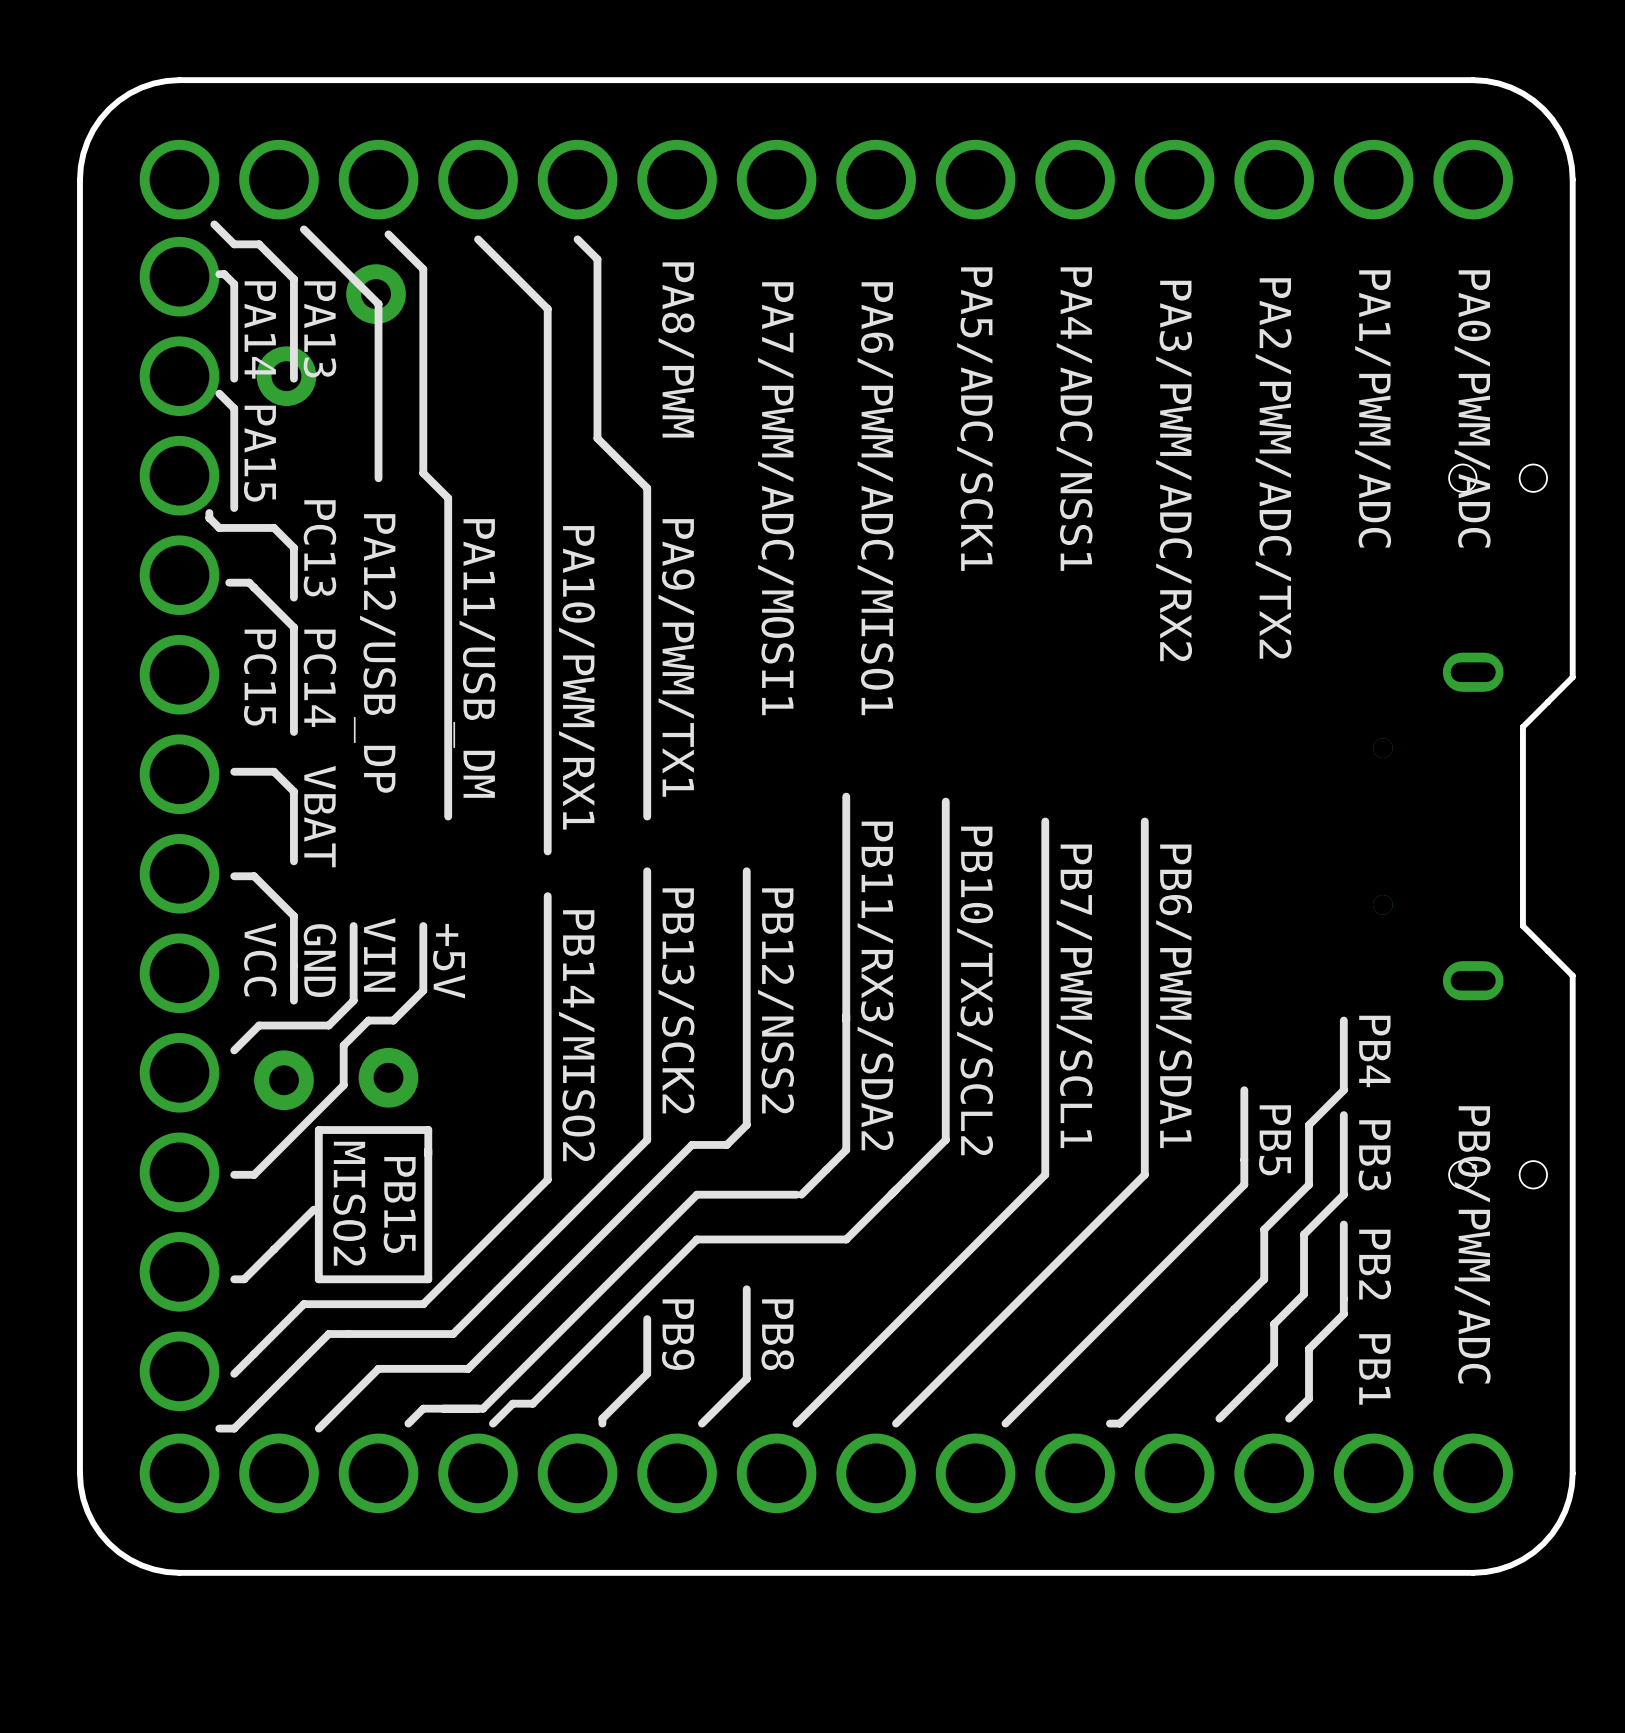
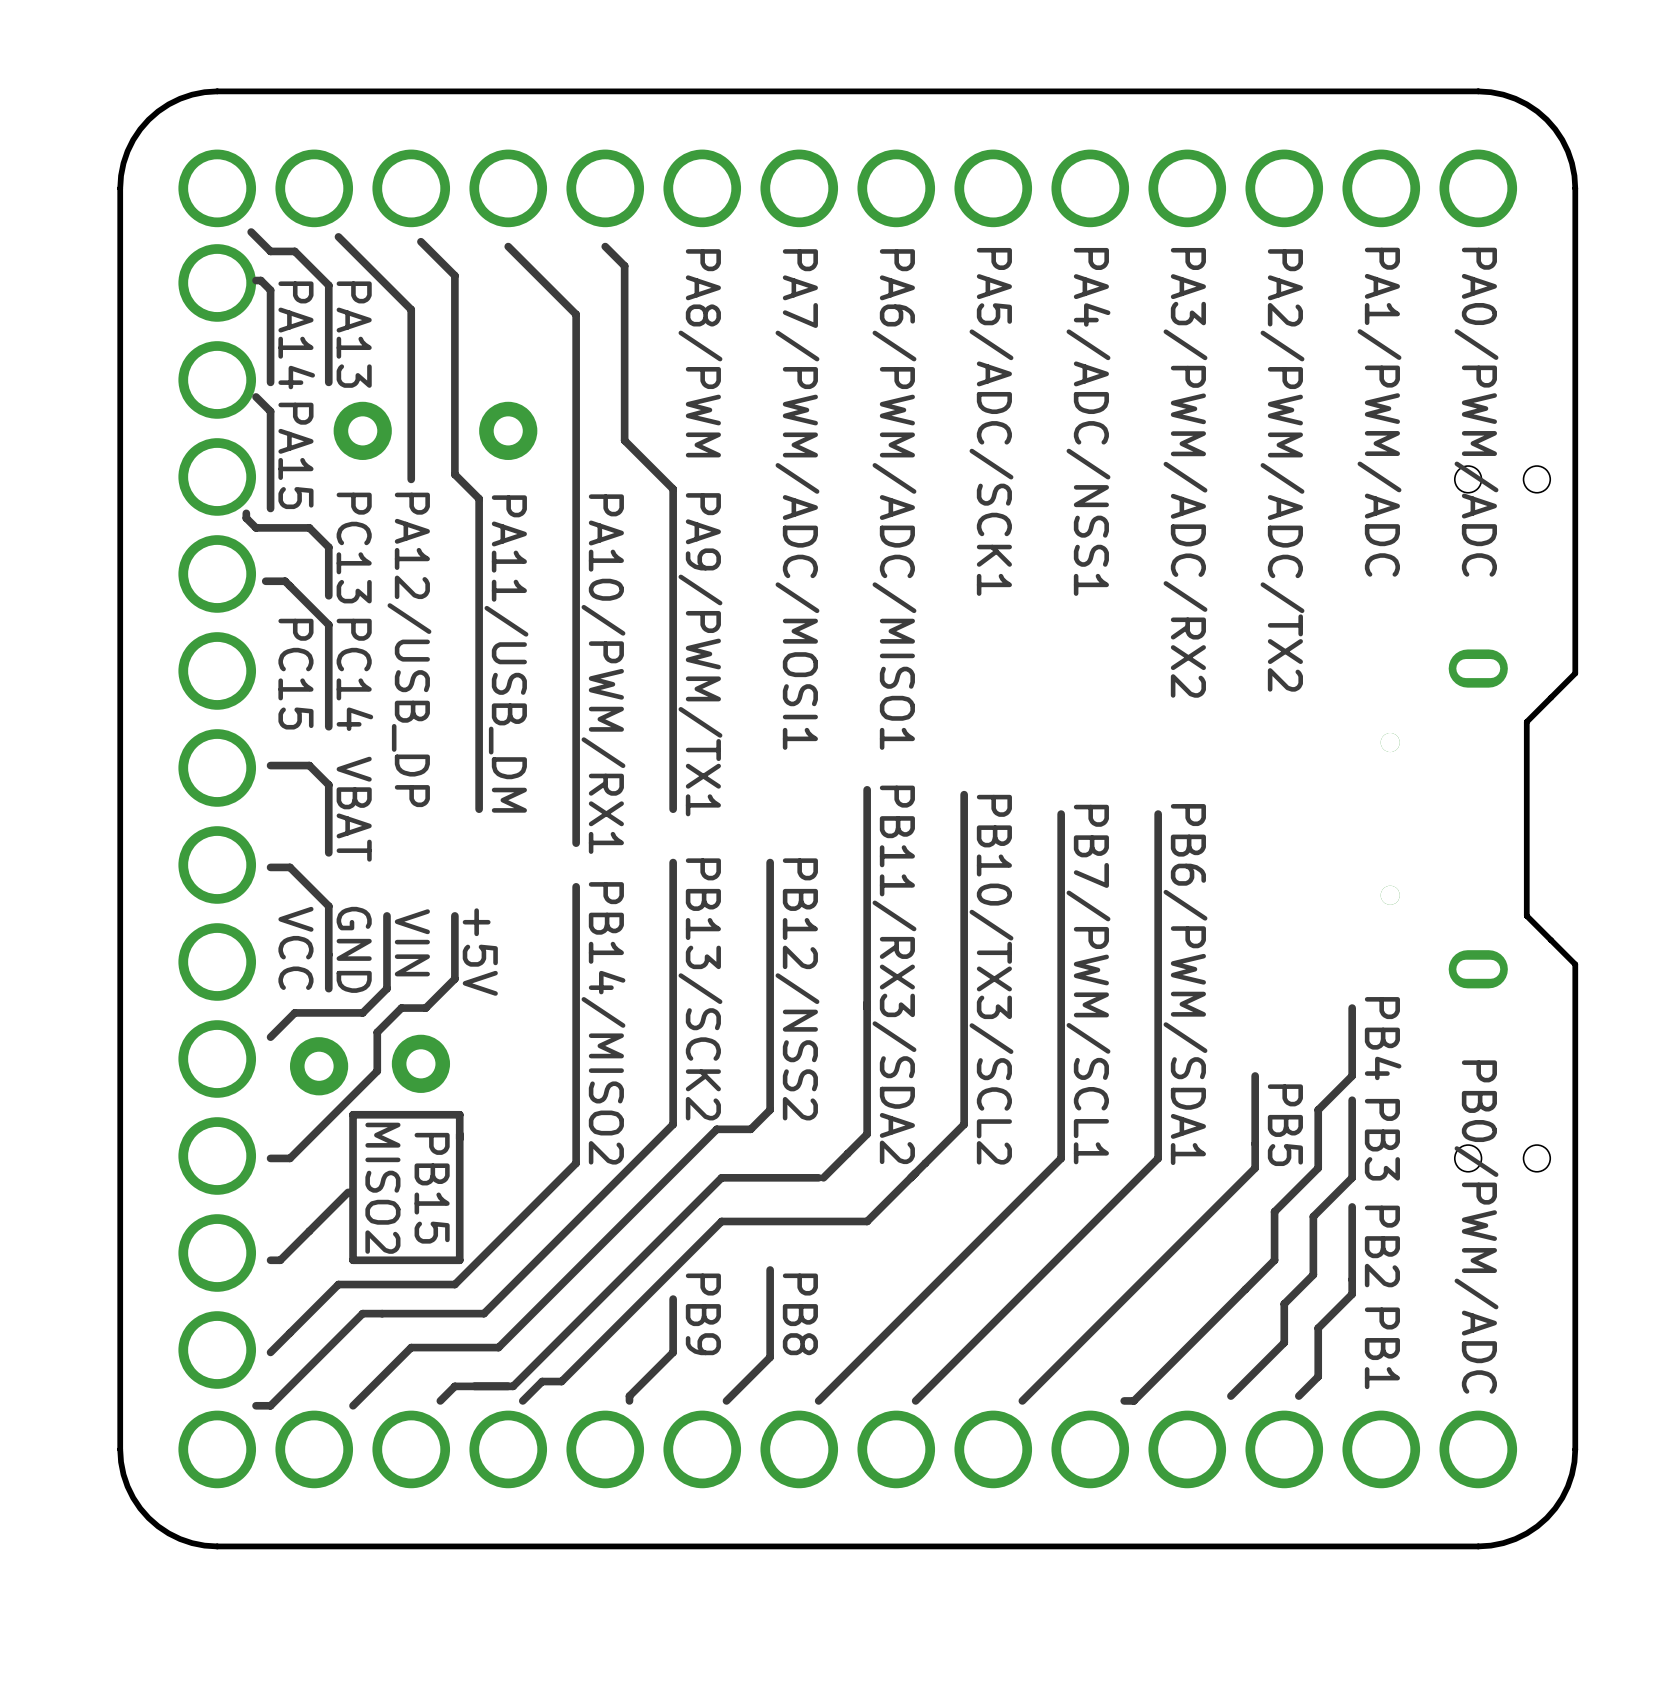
part: (376, 294) -> none
part position: (286, 376) -> (362, 430)
part: none -> (508, 430)

